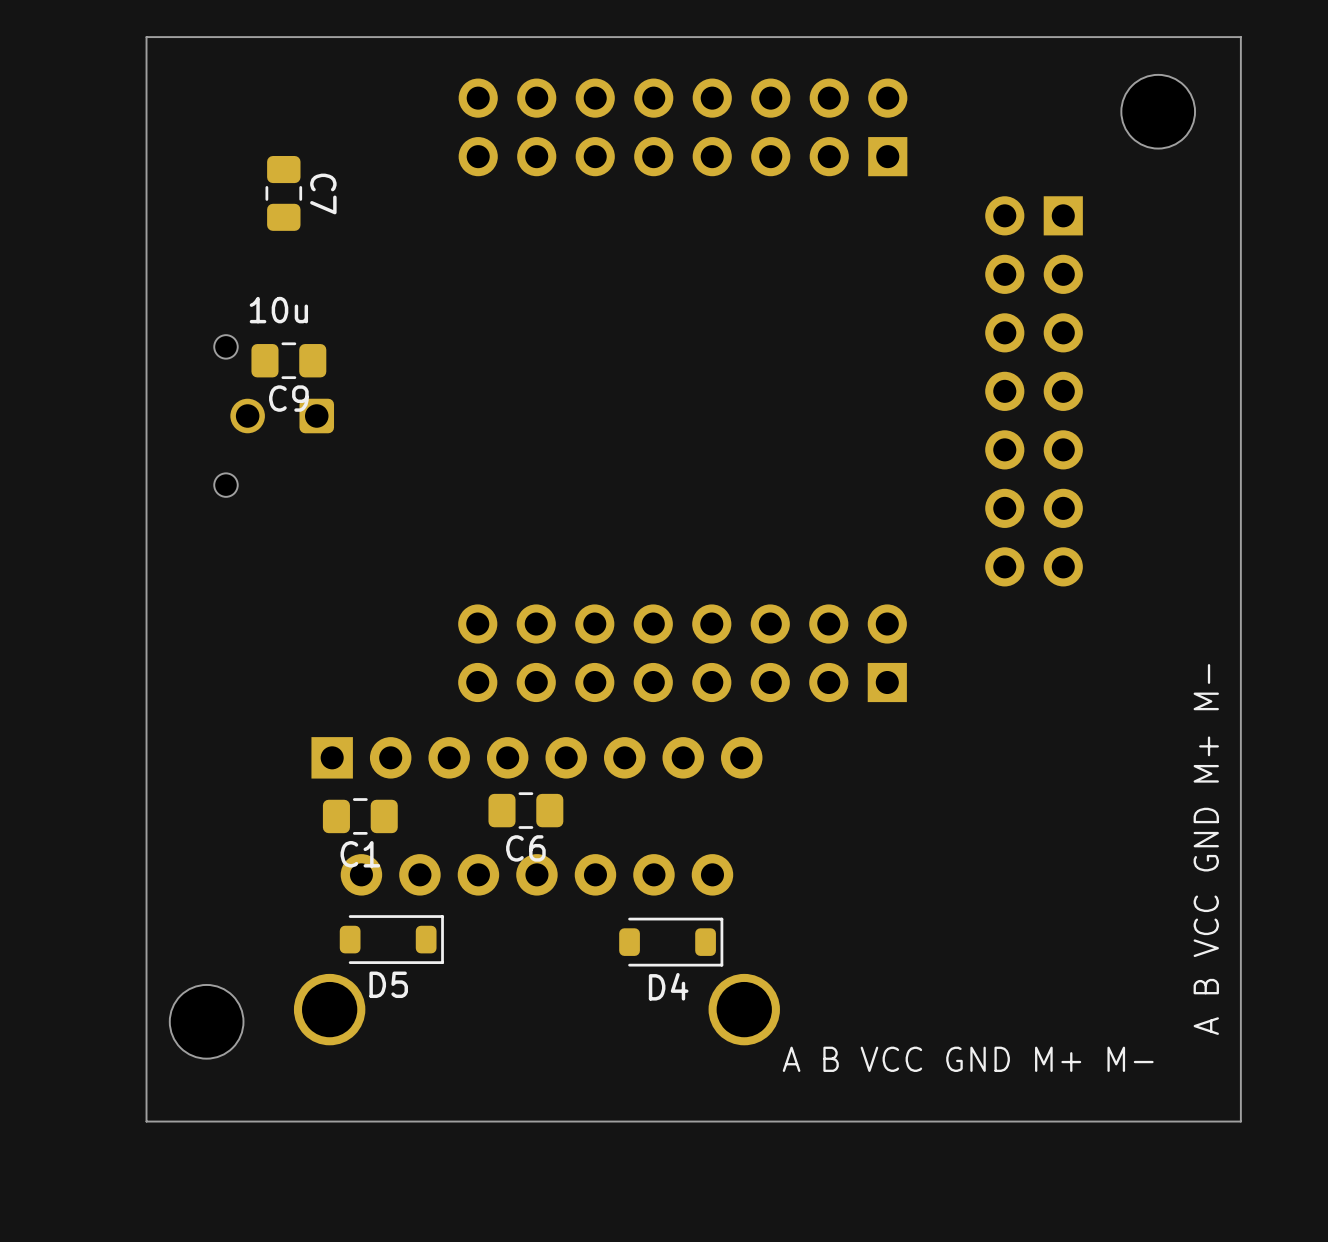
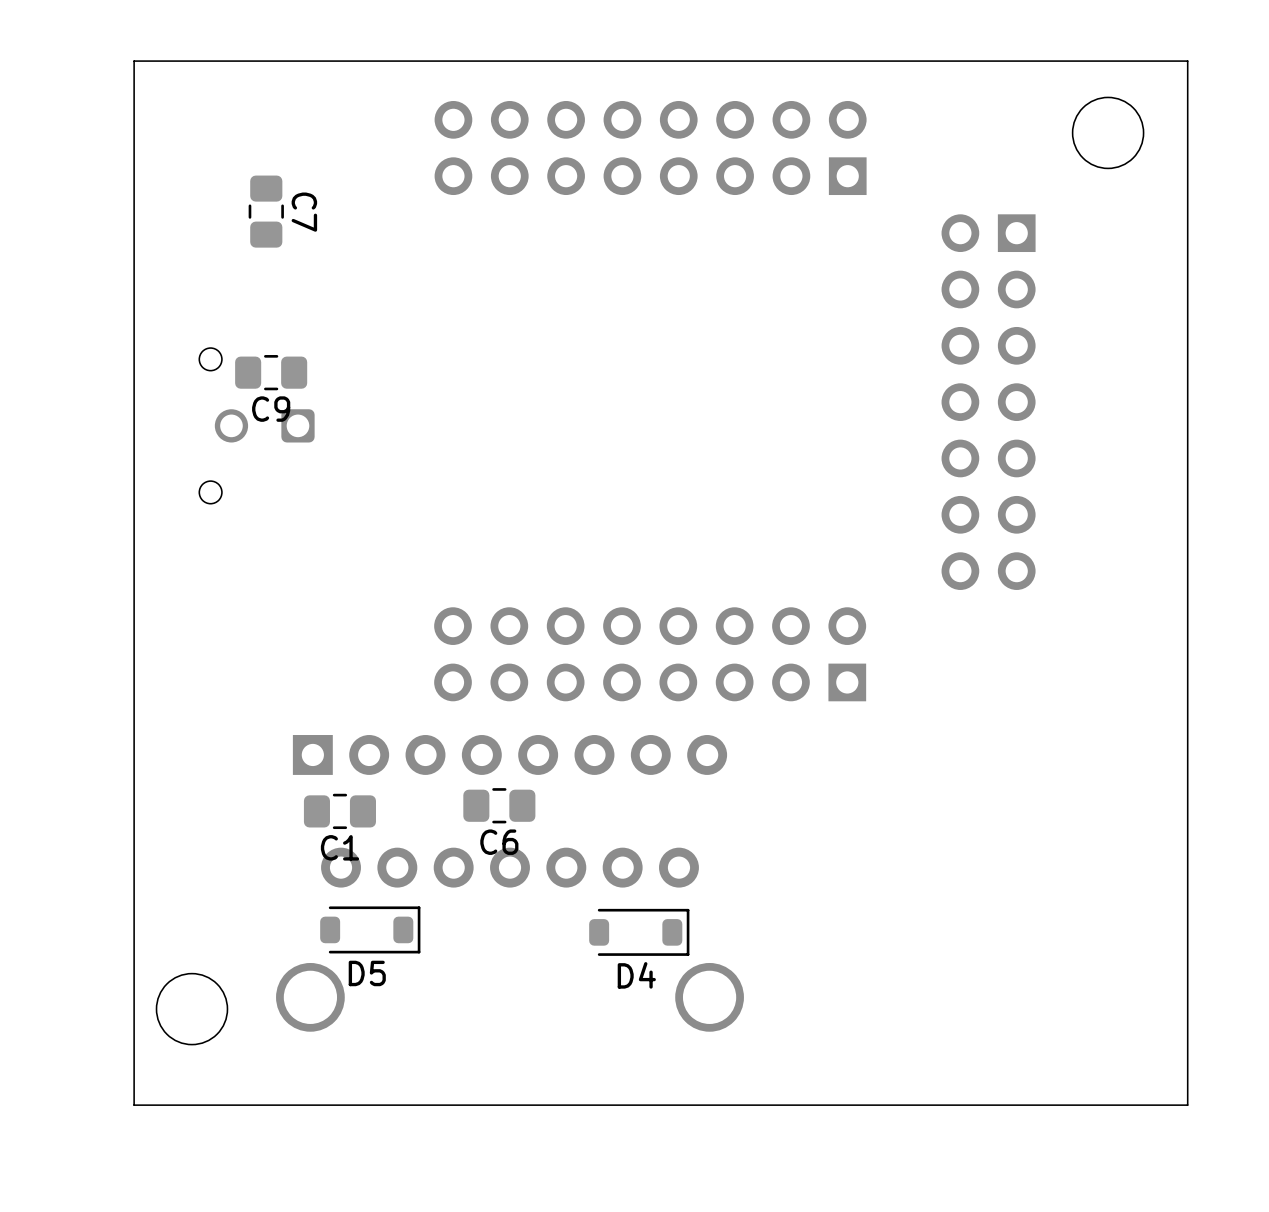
text: 10u (278, 310) -> none
text: A B VCC GND M+ M- (1206, 849) -> none
text: A B VCC GND M+ M- (968, 1059) -> none

